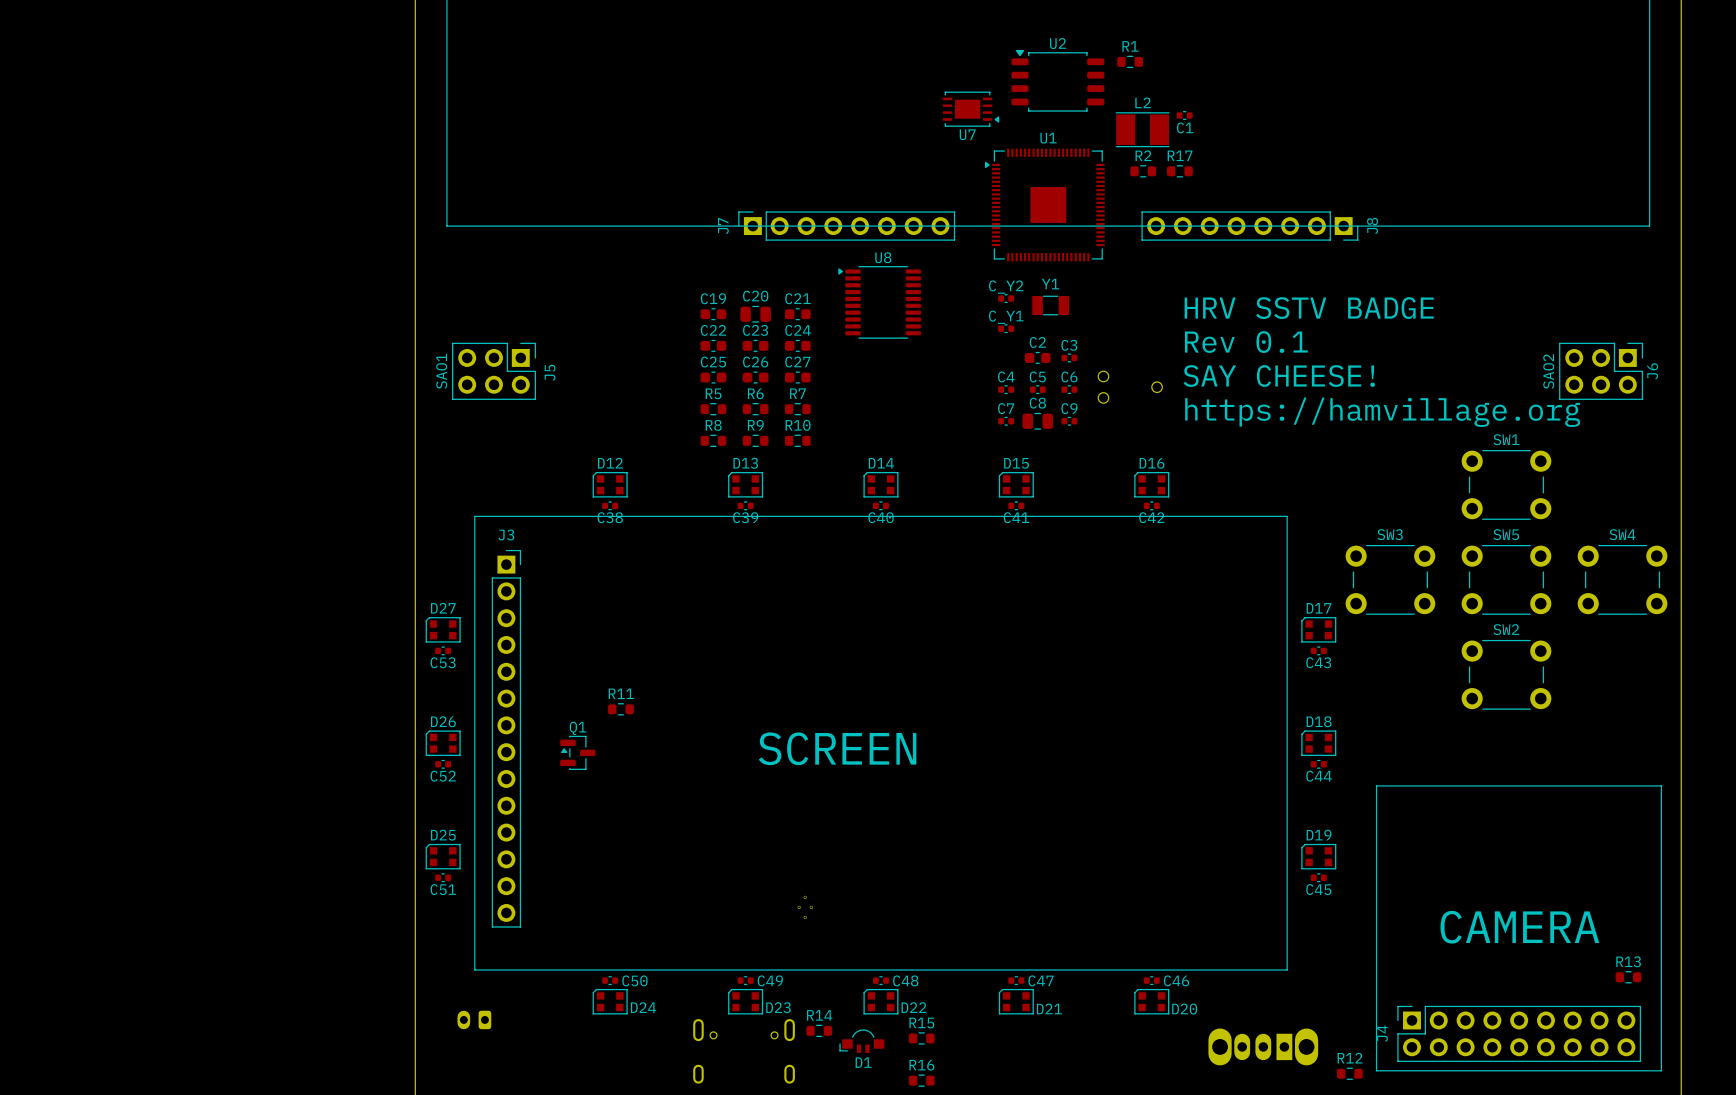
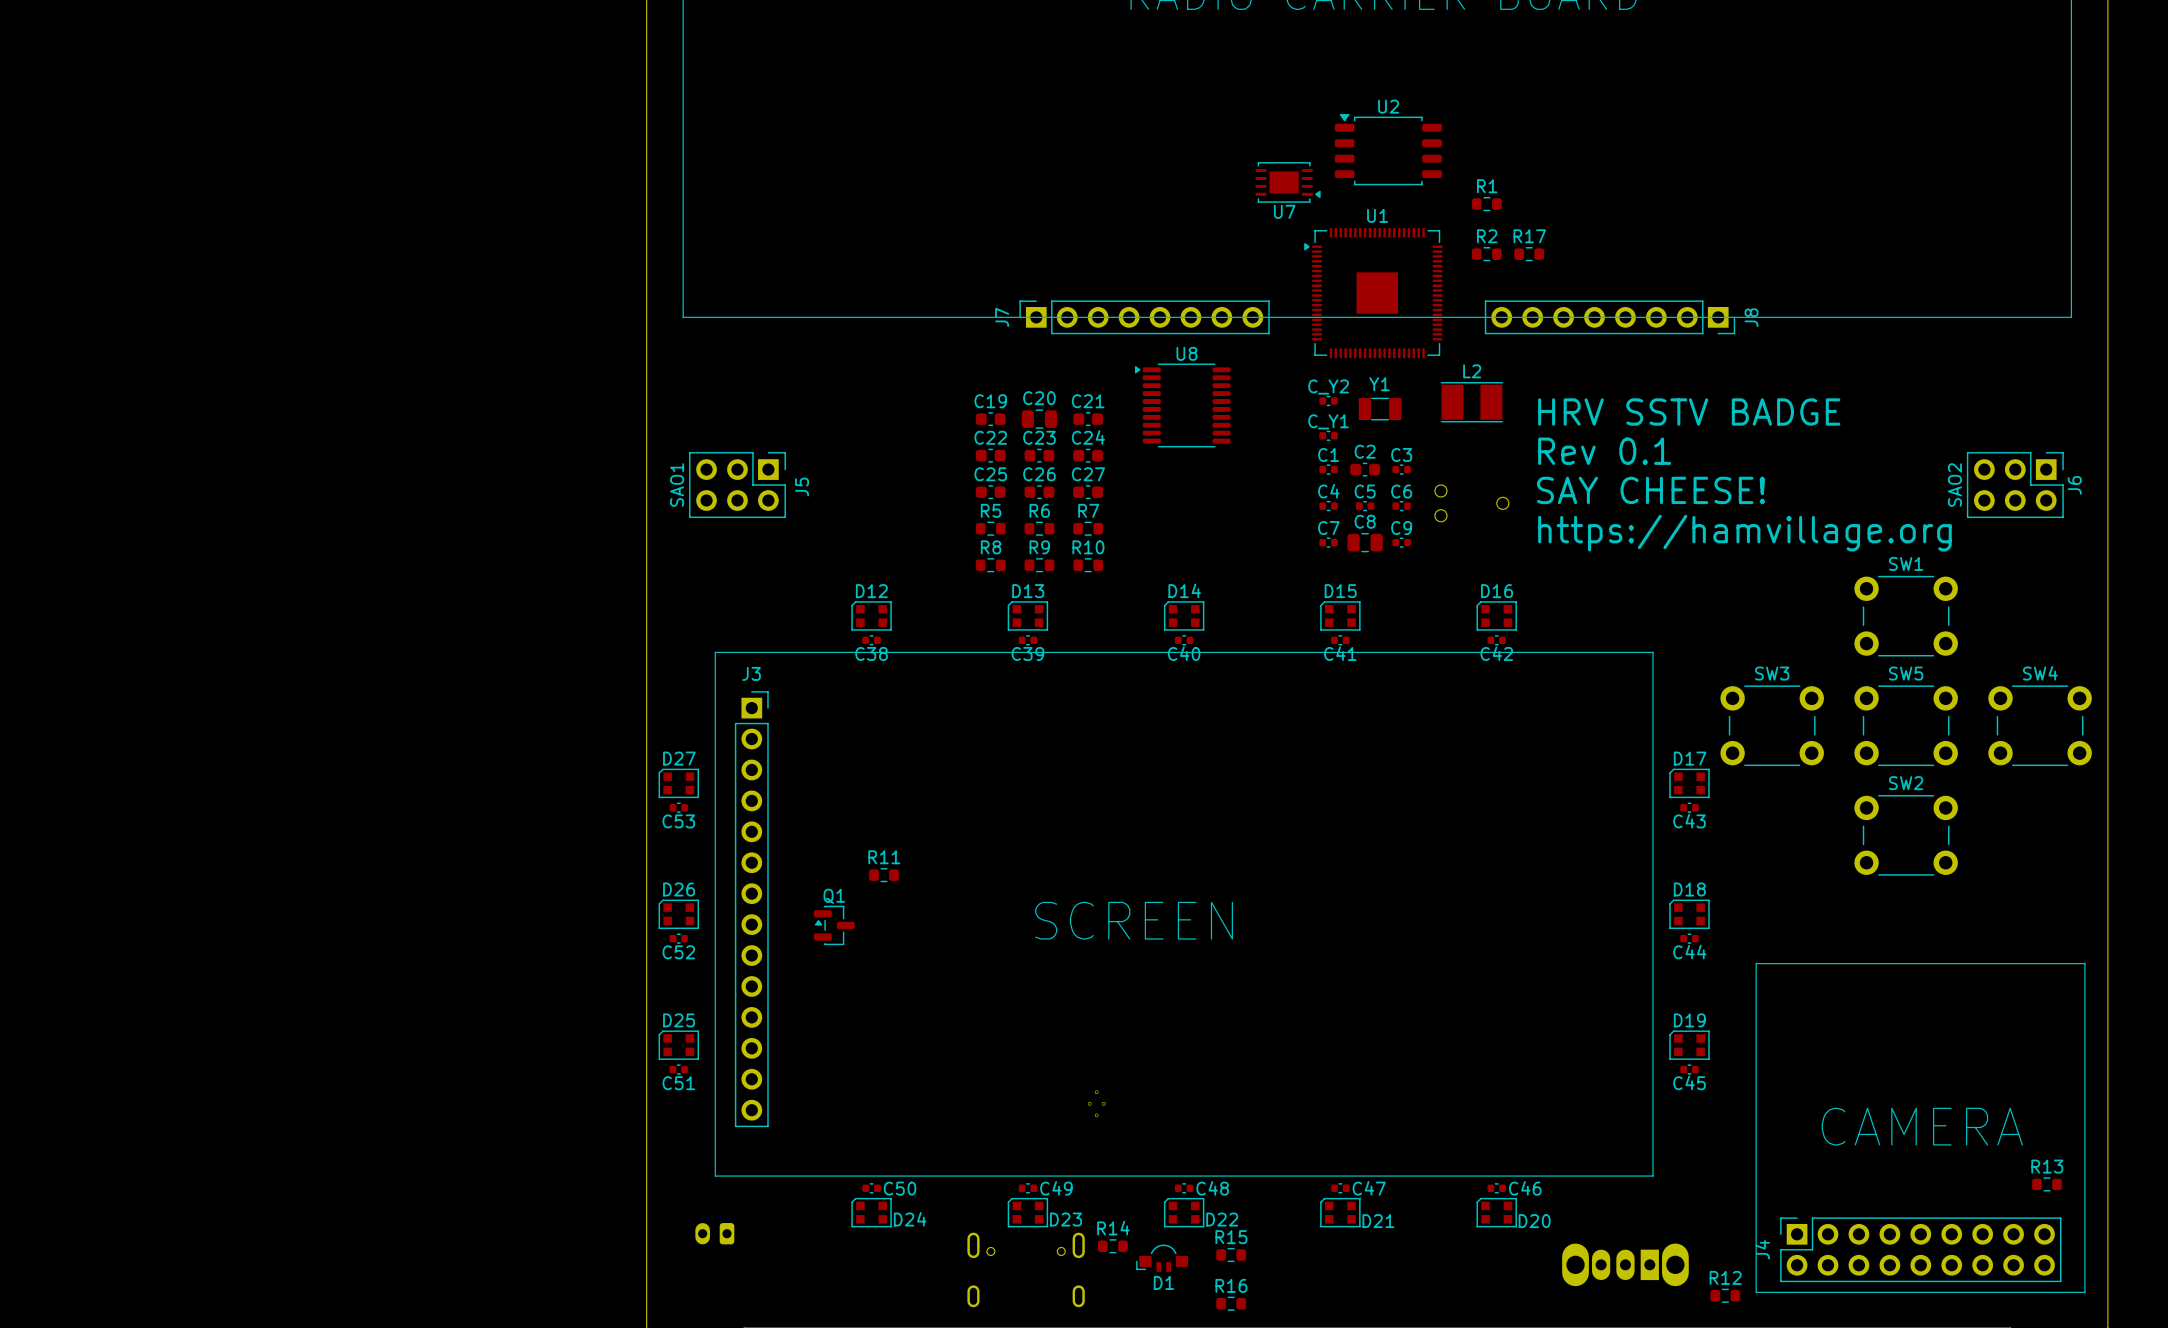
R1 position: (1130, 61) -> (1486, 204)
C1 position: (1184, 115) -> (1328, 469)
C1 name position: C1 (1185, 127) -> C1 (1328, 454)
L2 position: (1142, 129) -> (1471, 402)

